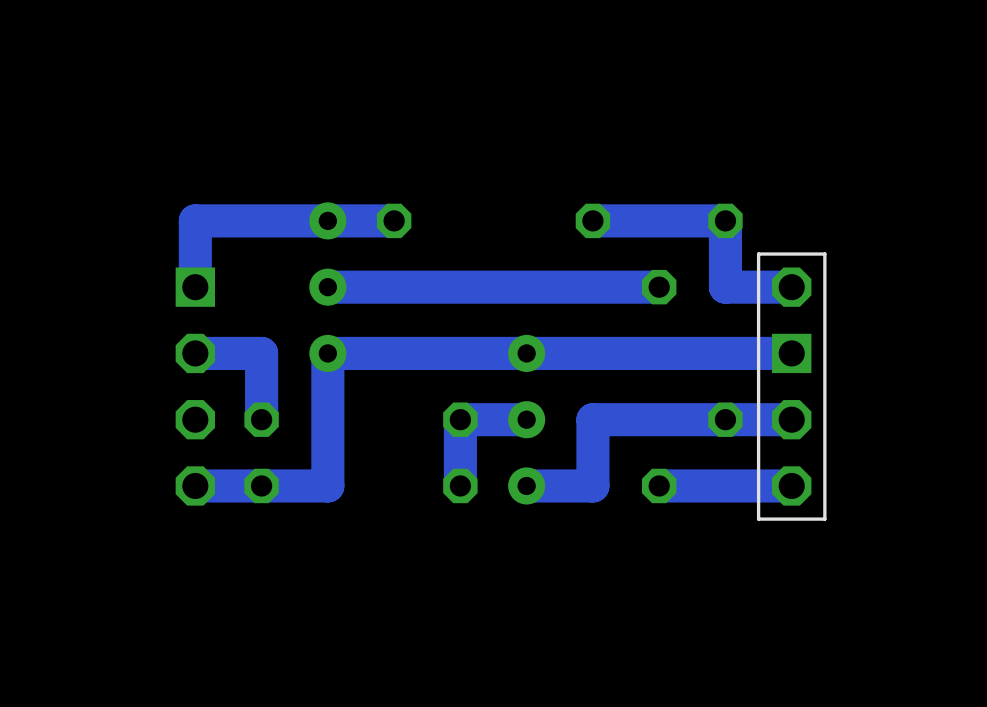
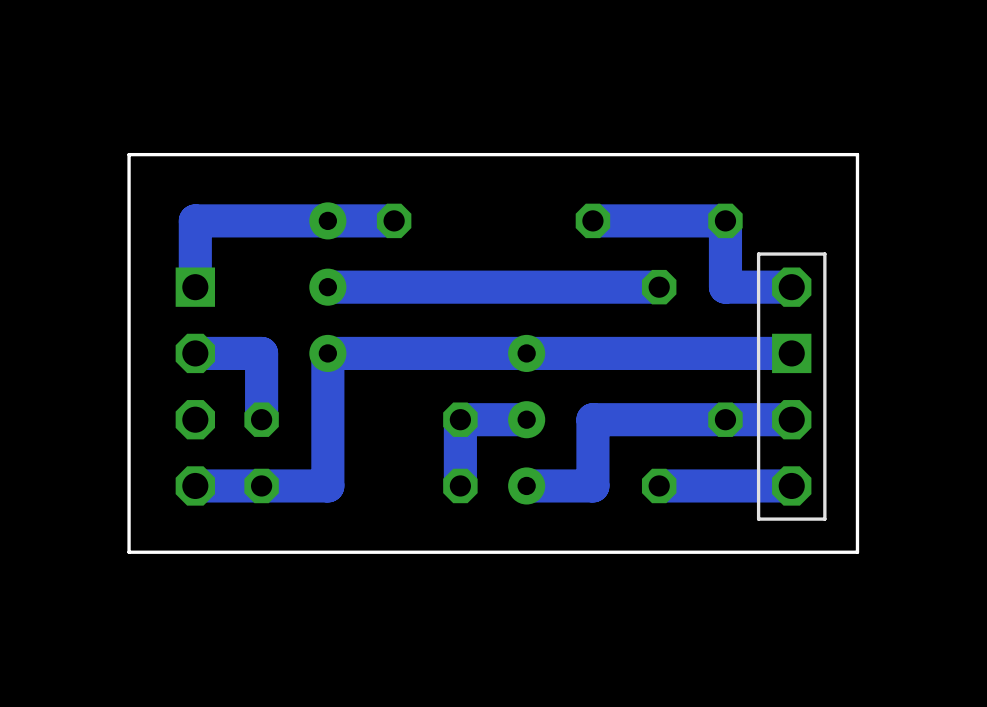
board edge: none -> (857, 154) (129, 154) (129, 552) (857, 552) (857, 154)

